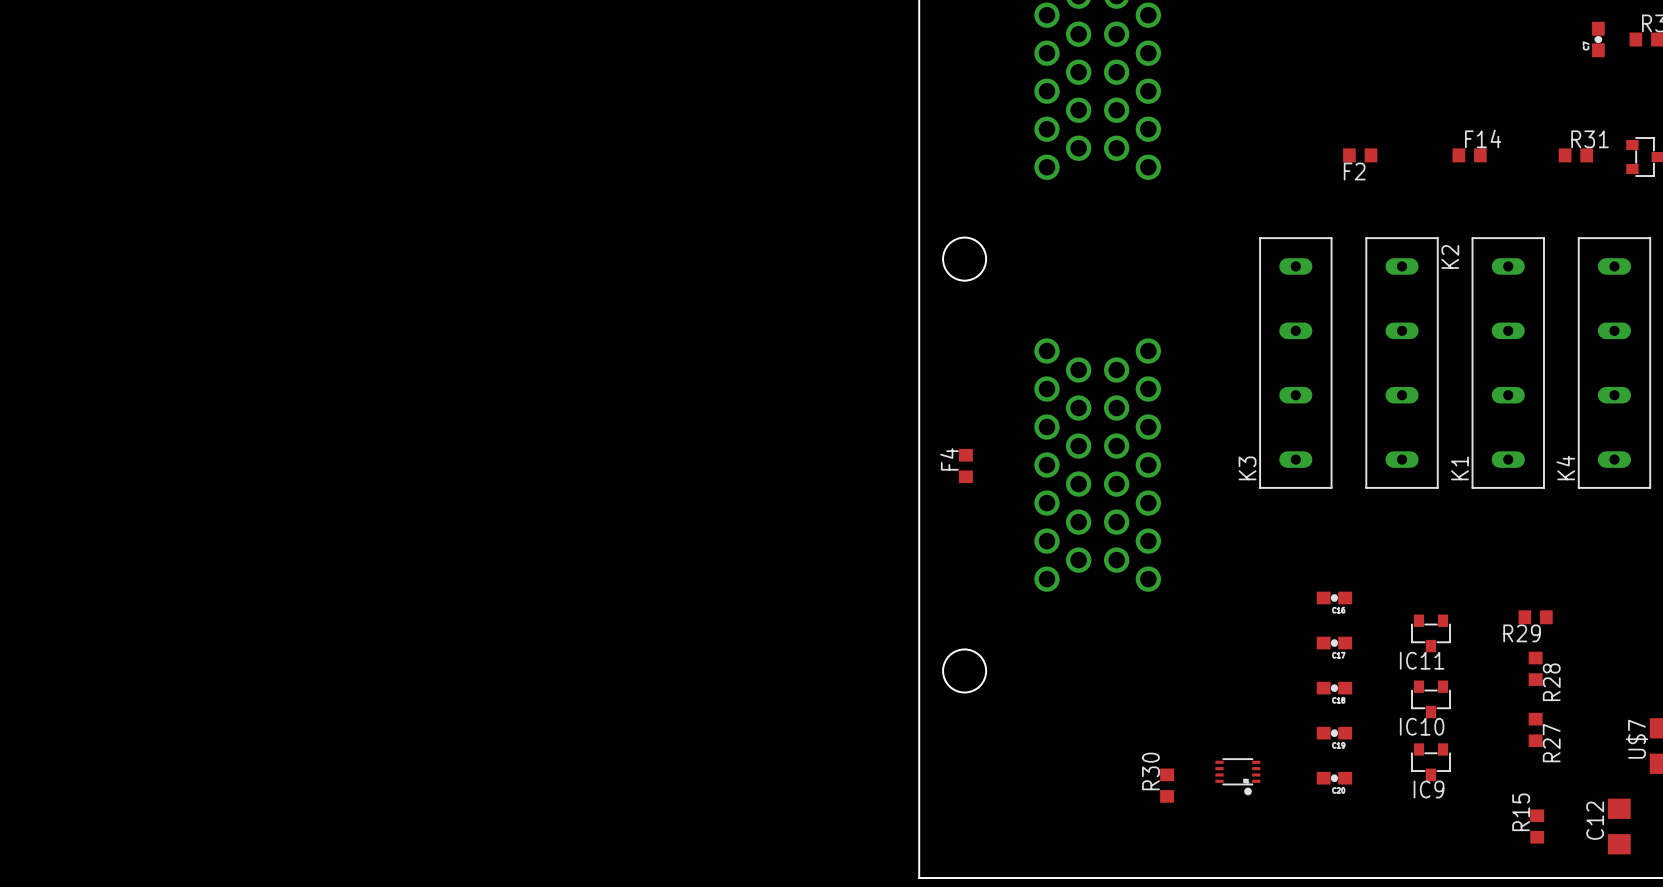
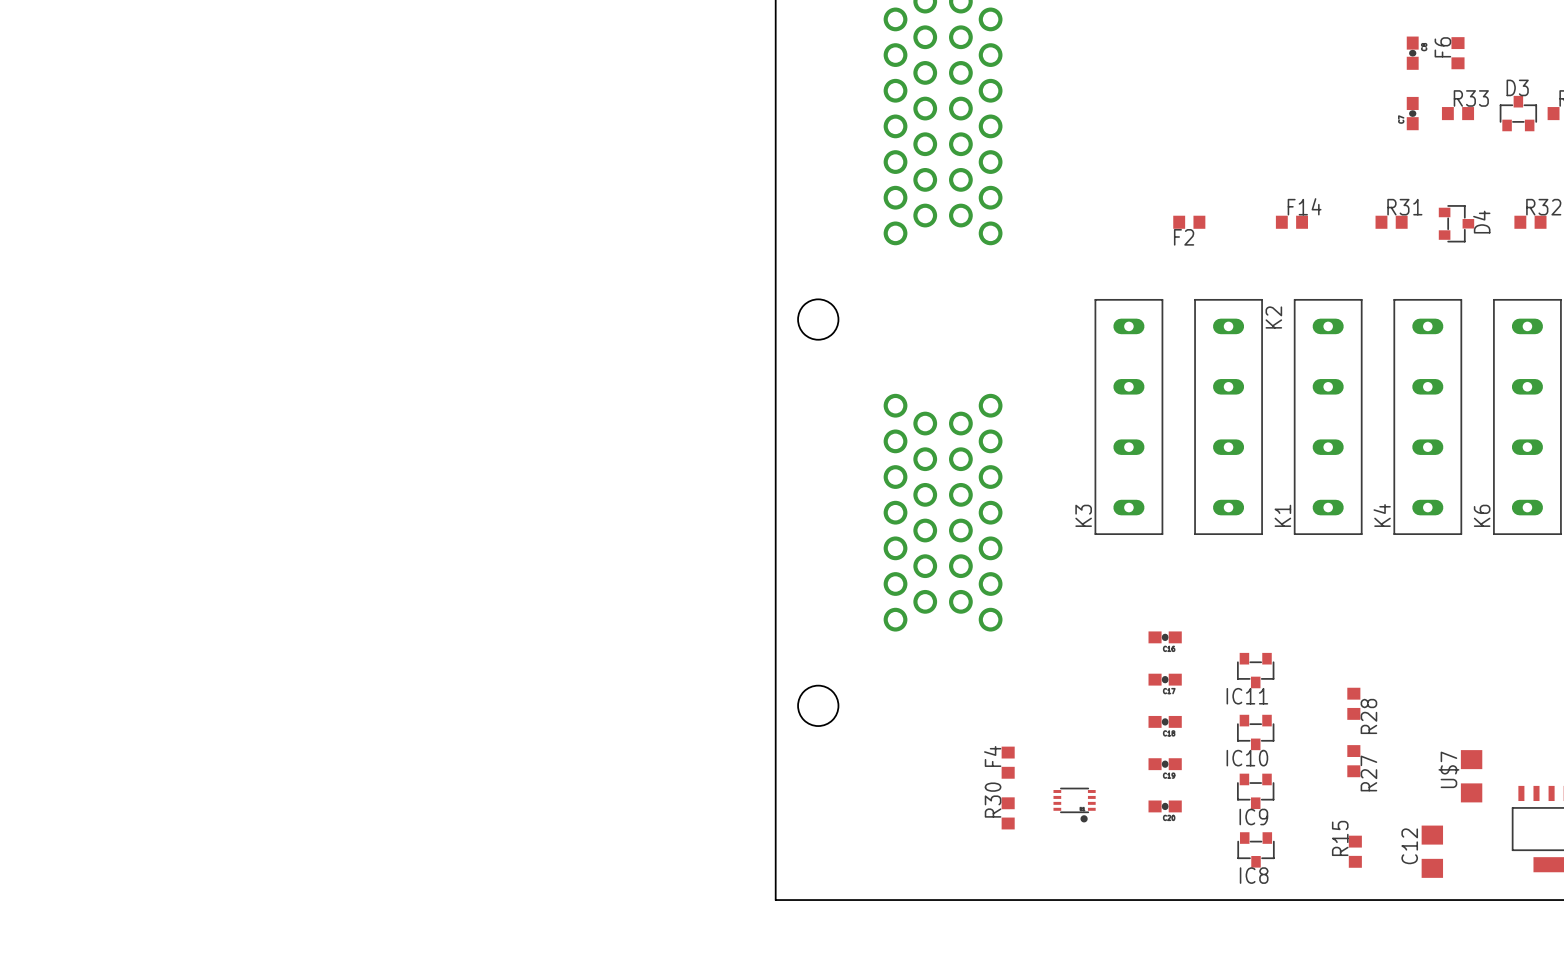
F4 position: (965, 466) -> (1008, 762)
R29: (1535, 617) -> none
IC8: none -> (1256, 849)

